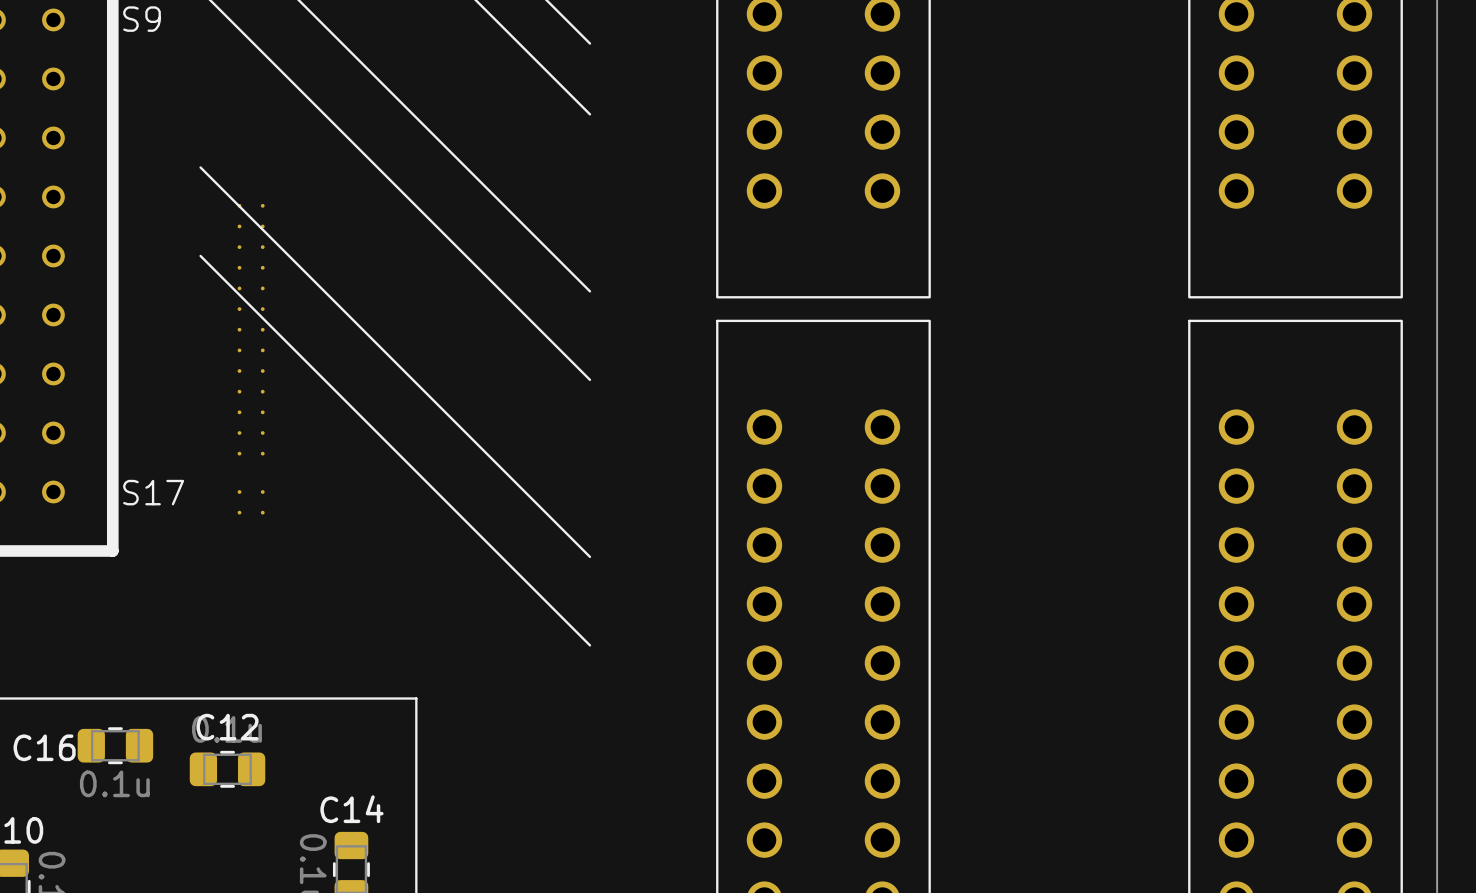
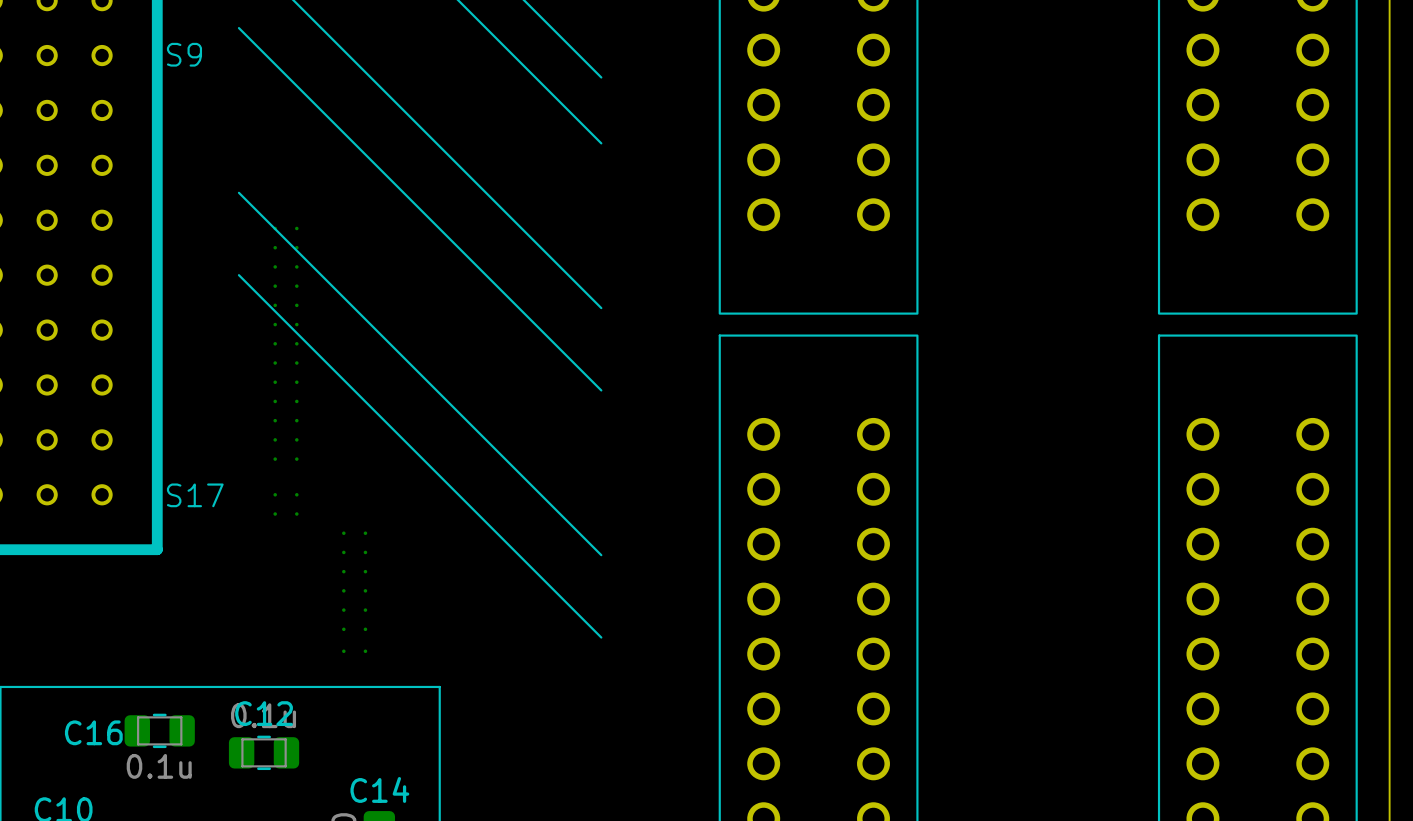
part: none -> (354, 533)
part: none -> (354, 552)
part: none -> (354, 571)
part: none -> (354, 590)
part: none -> (354, 610)
part: none -> (354, 629)
part: none -> (354, 651)

